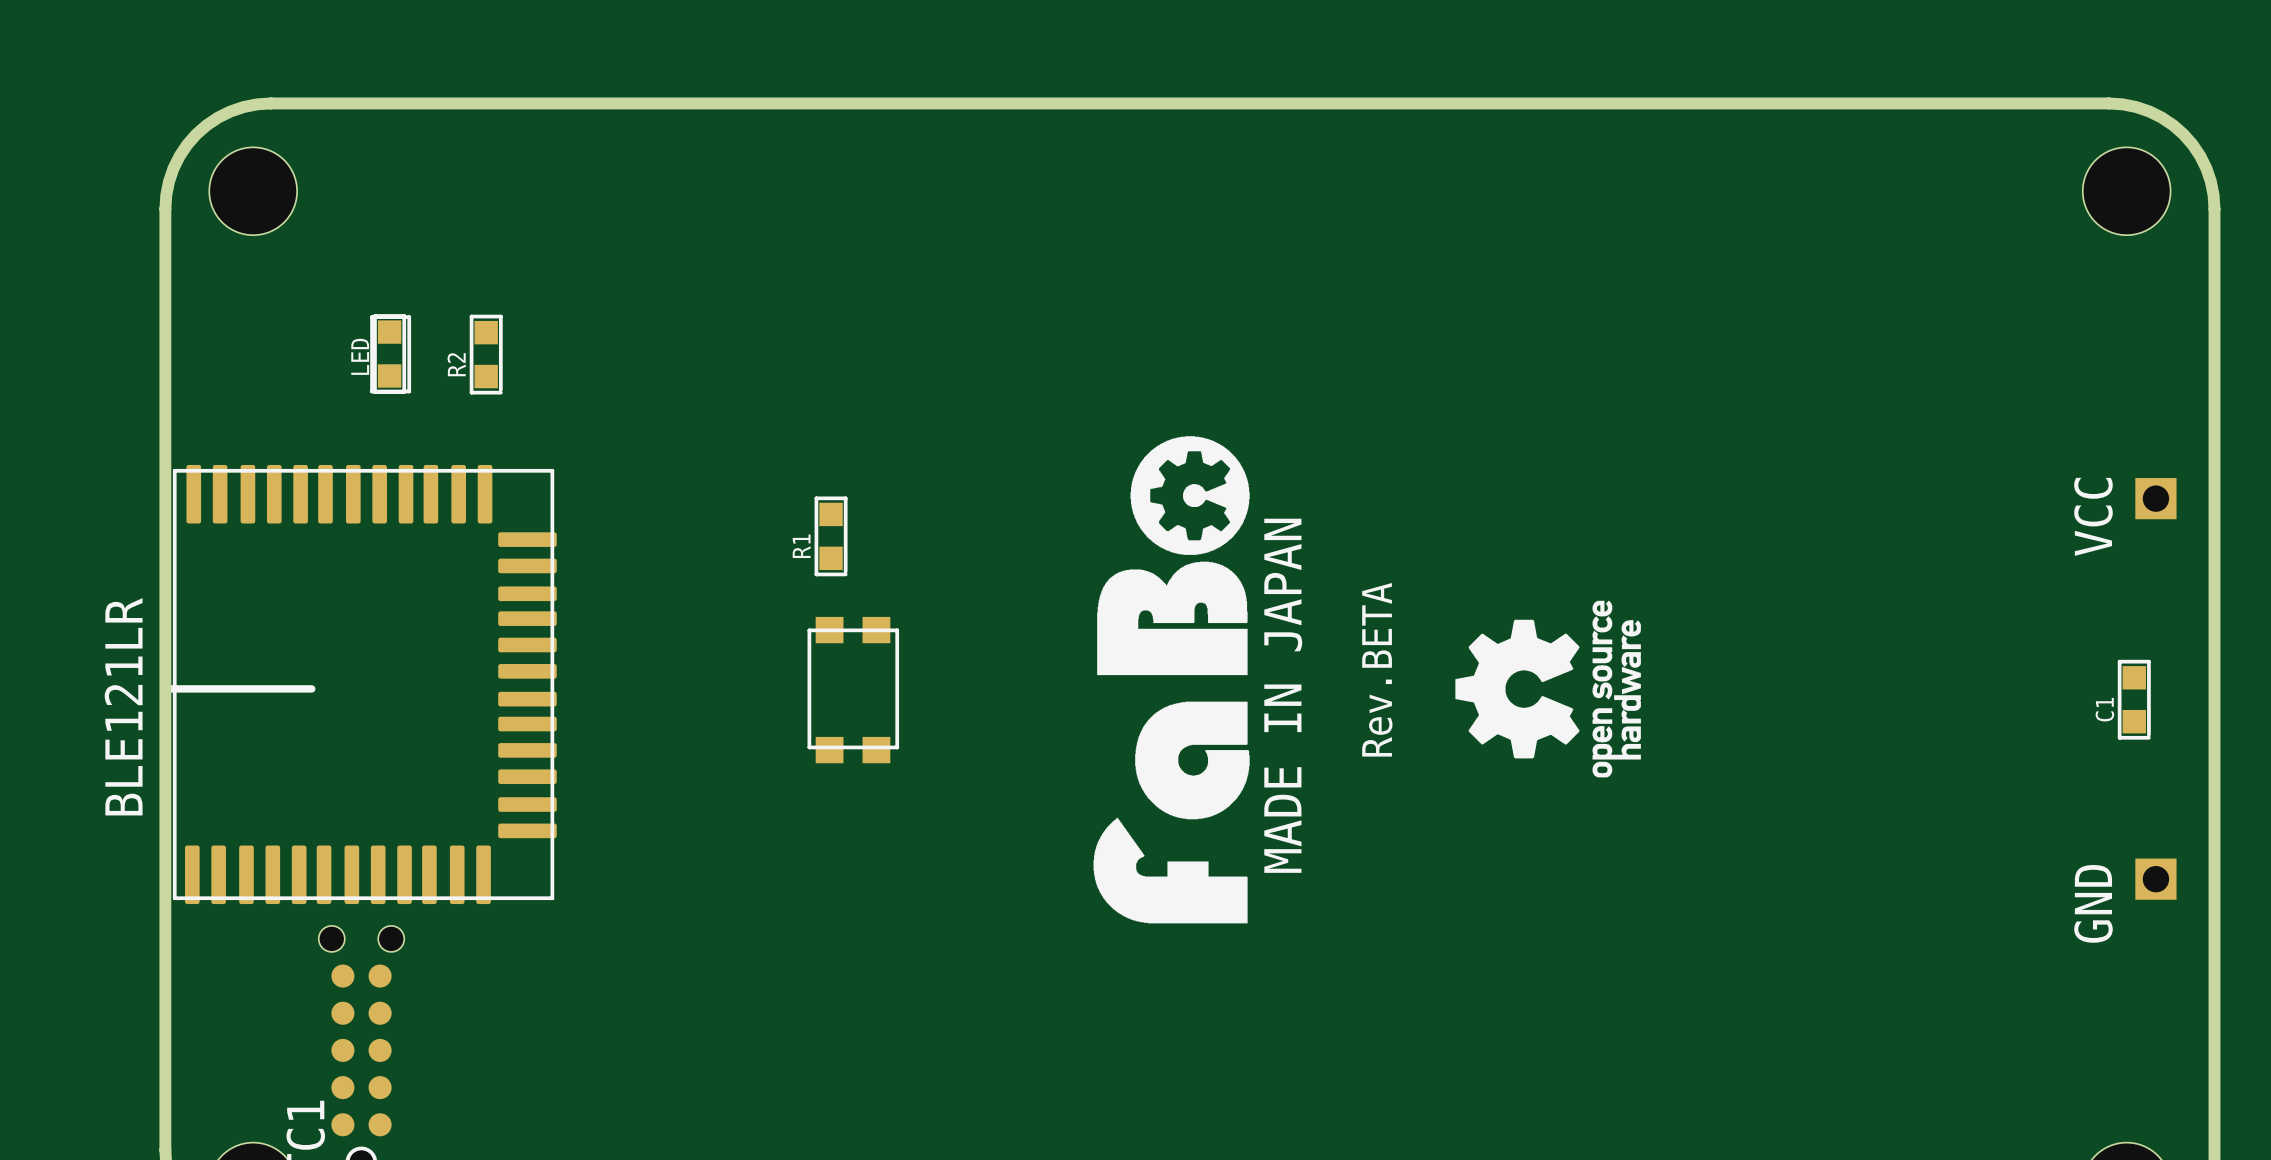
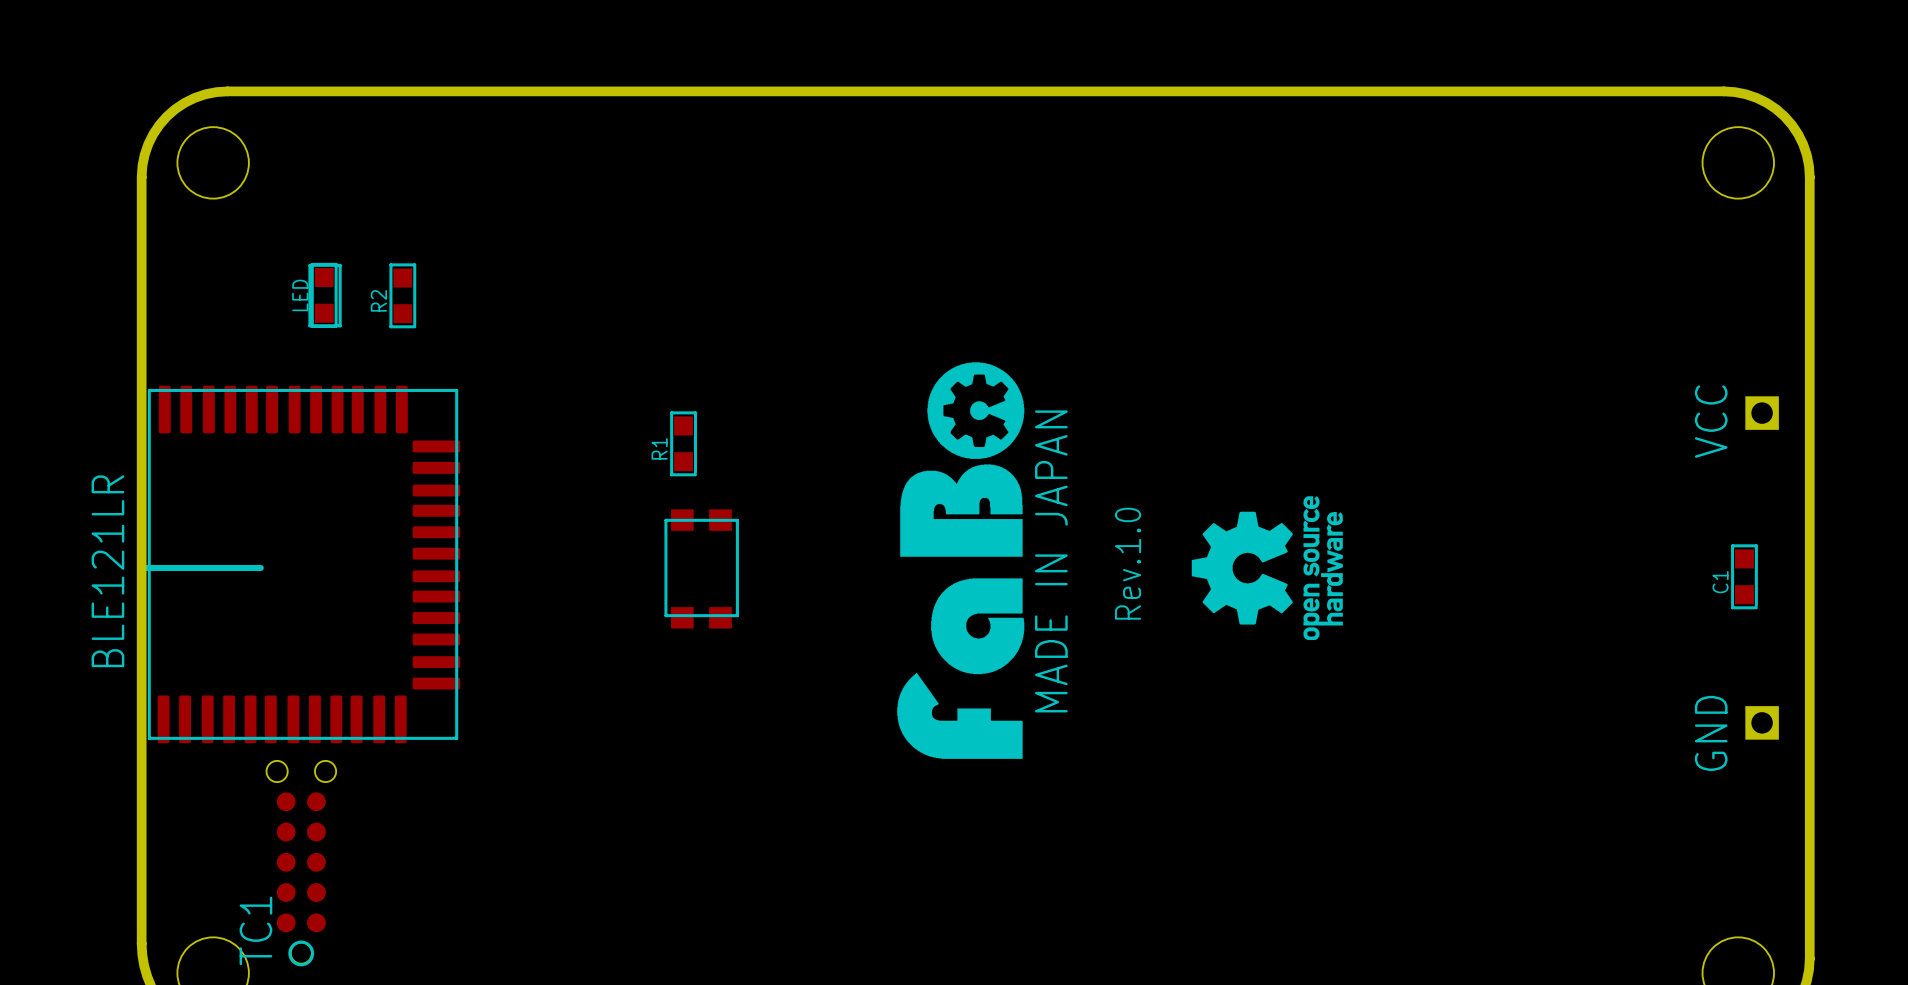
text: Rev.BETA (1377, 669) -> Rev.1.0 (1128, 563)

